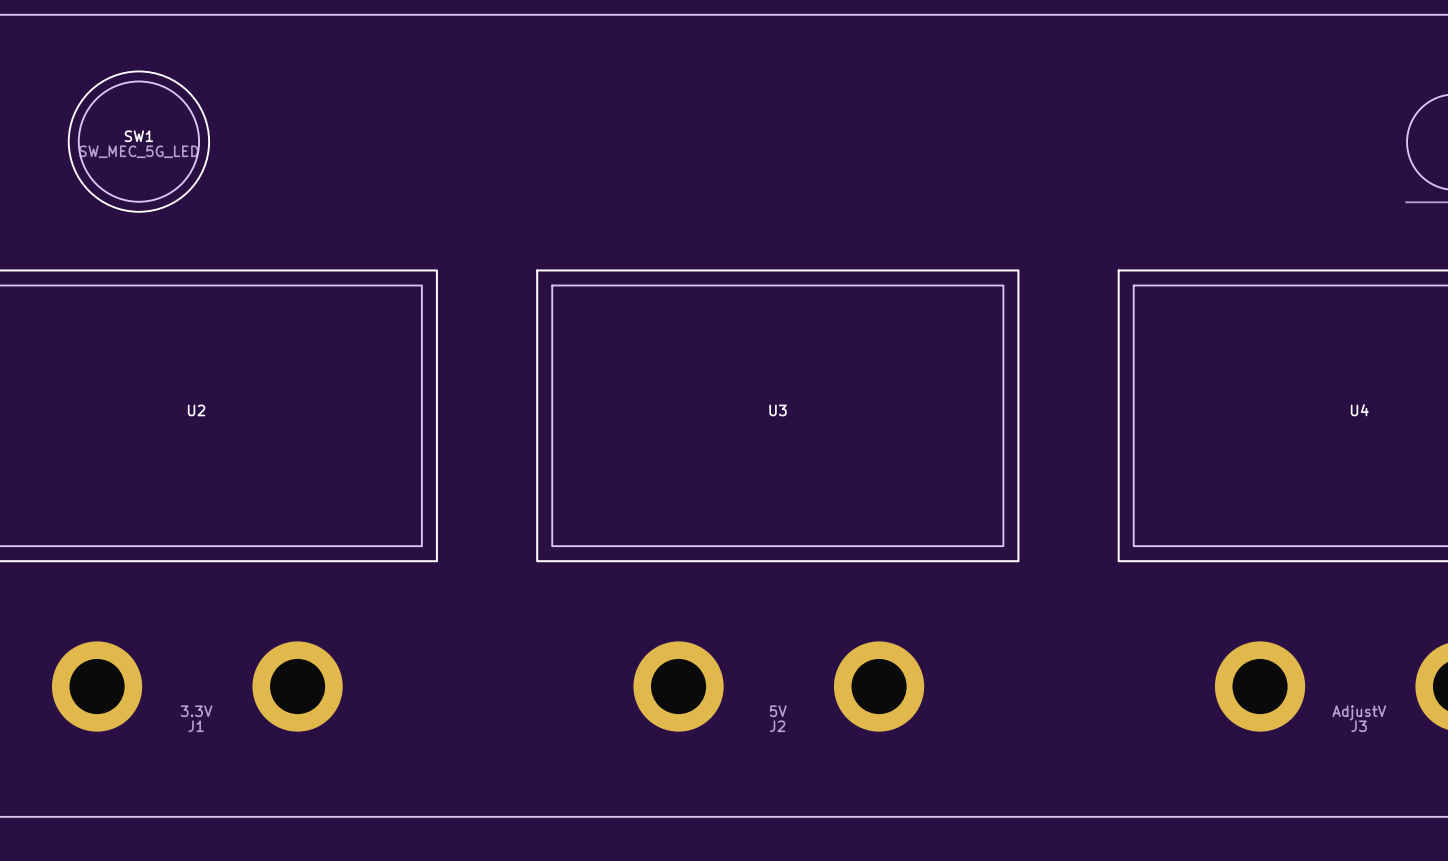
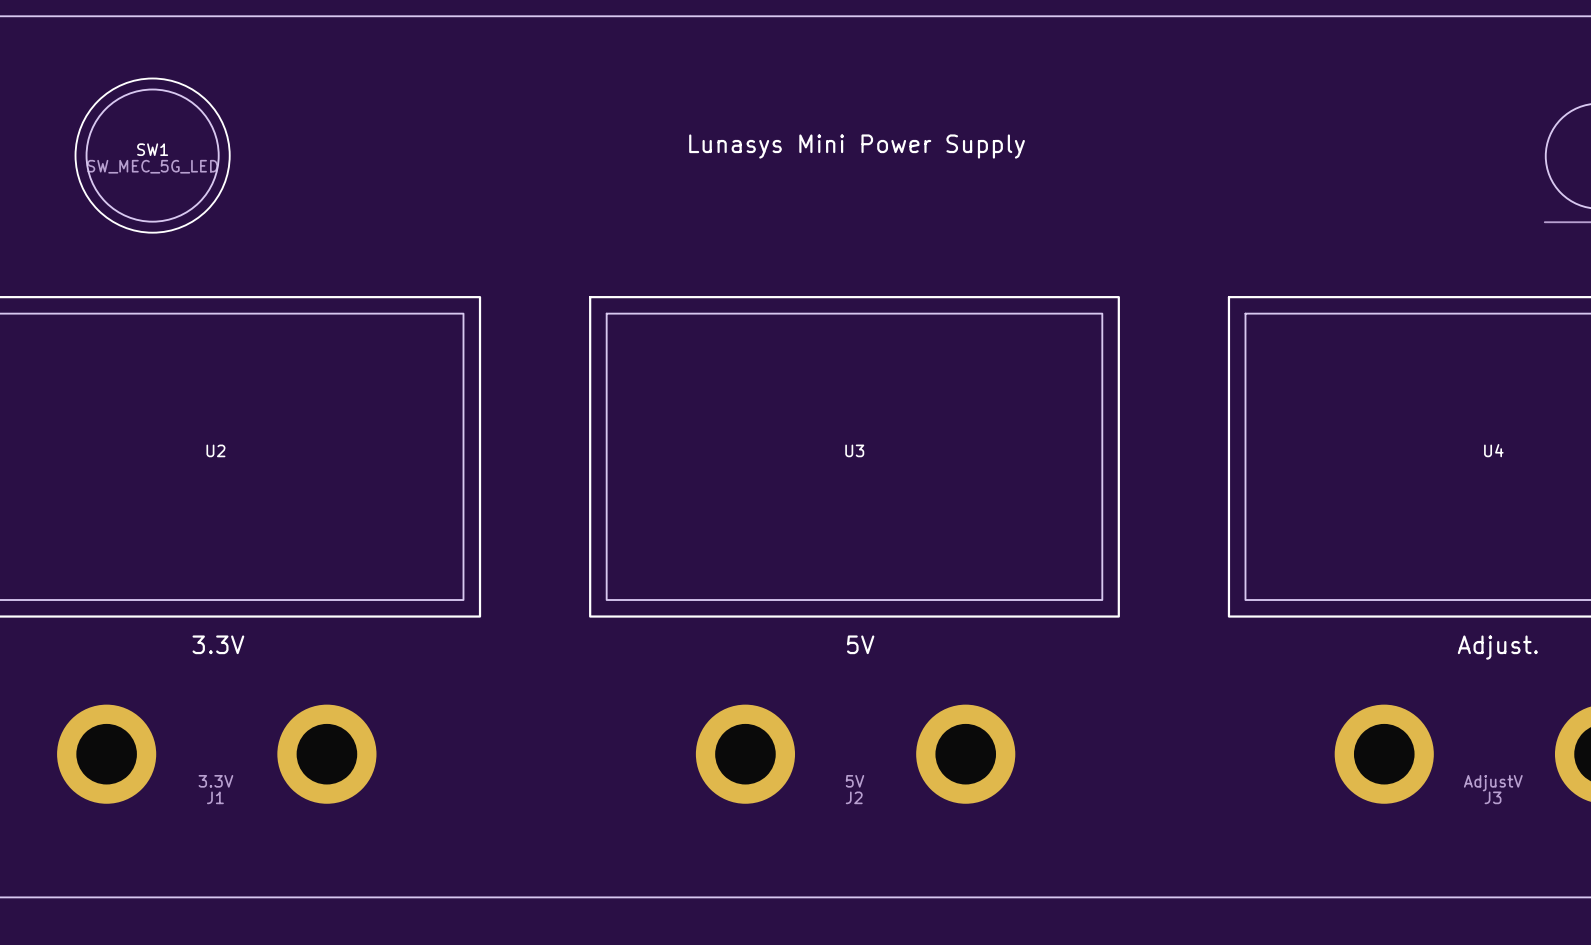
text: none -> Lunasys Mini Power Supply (857, 146)
text: none -> 3.3V (218, 644)
text: none -> 5V (860, 644)
text: none -> Adjust. (1497, 647)

